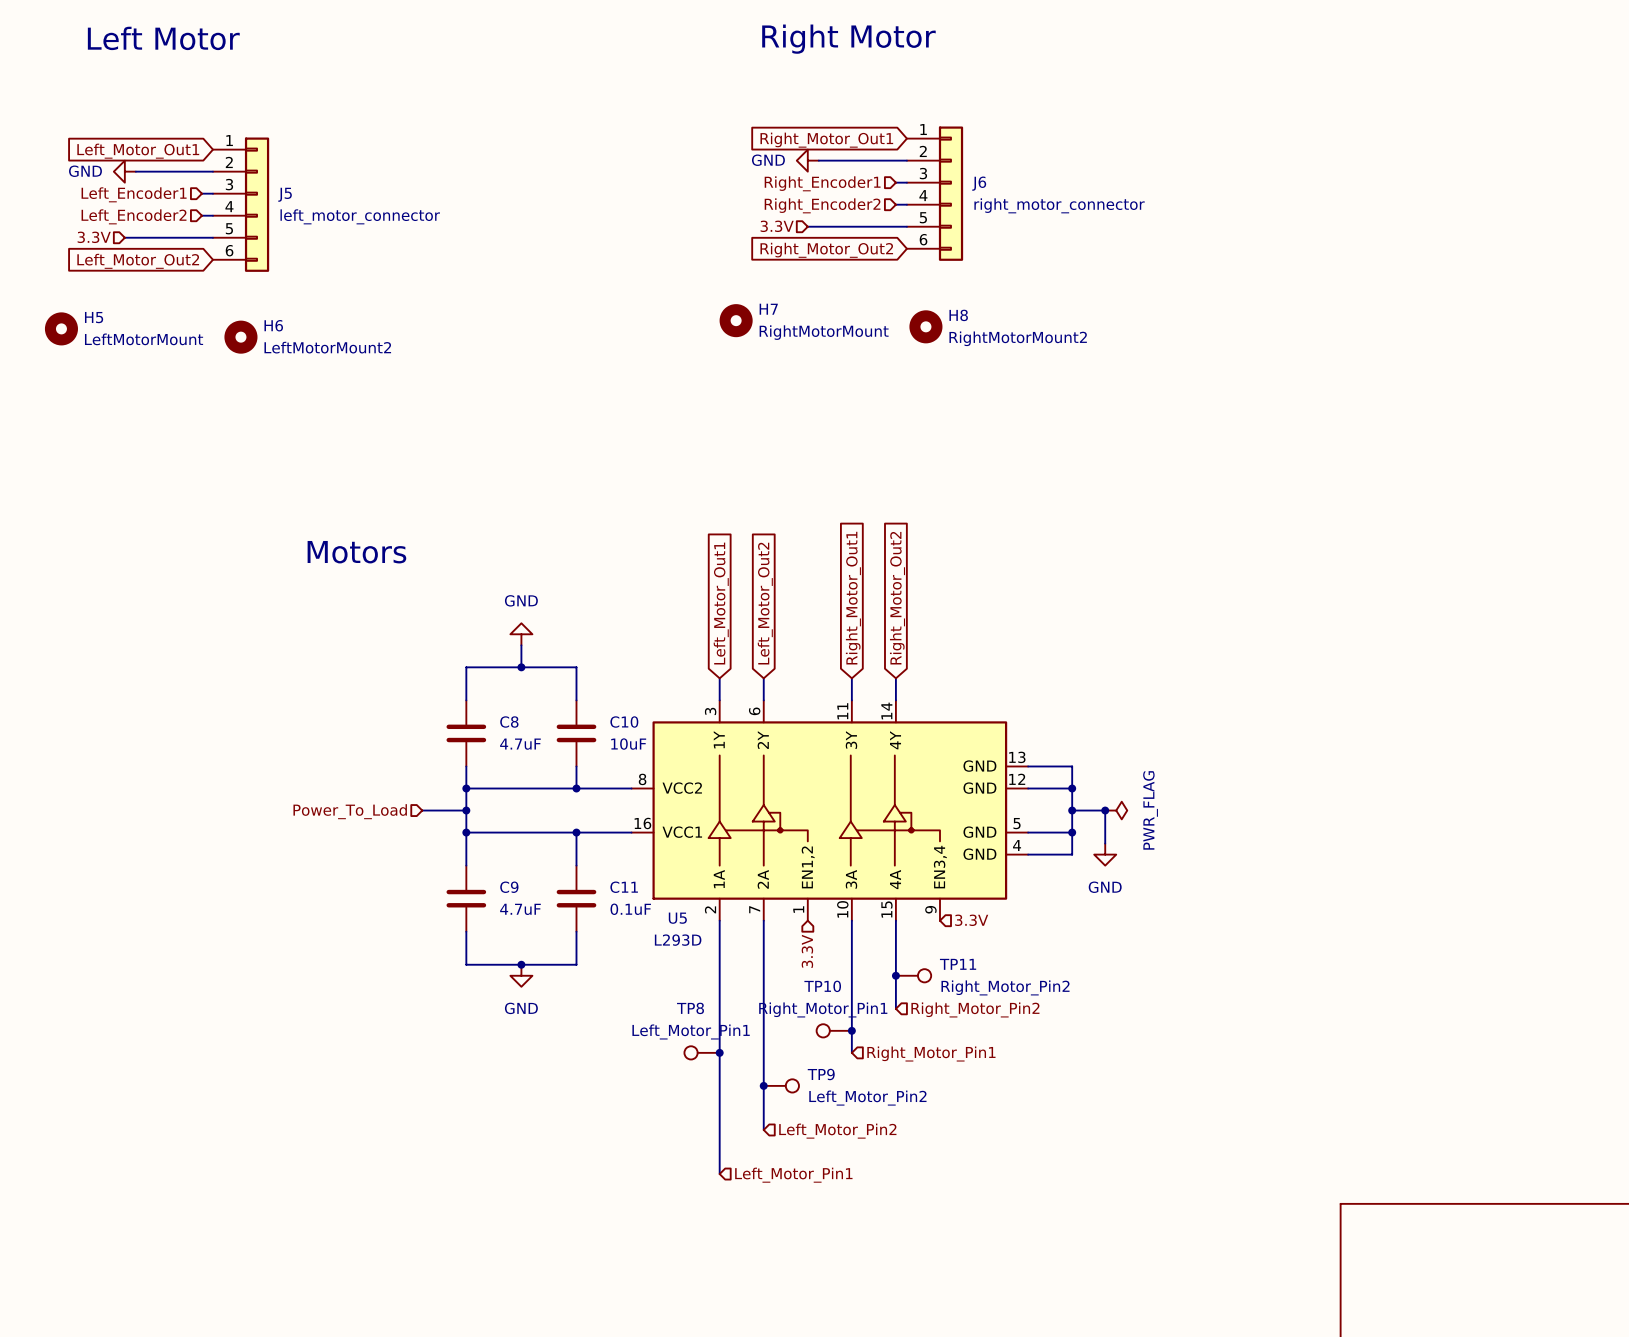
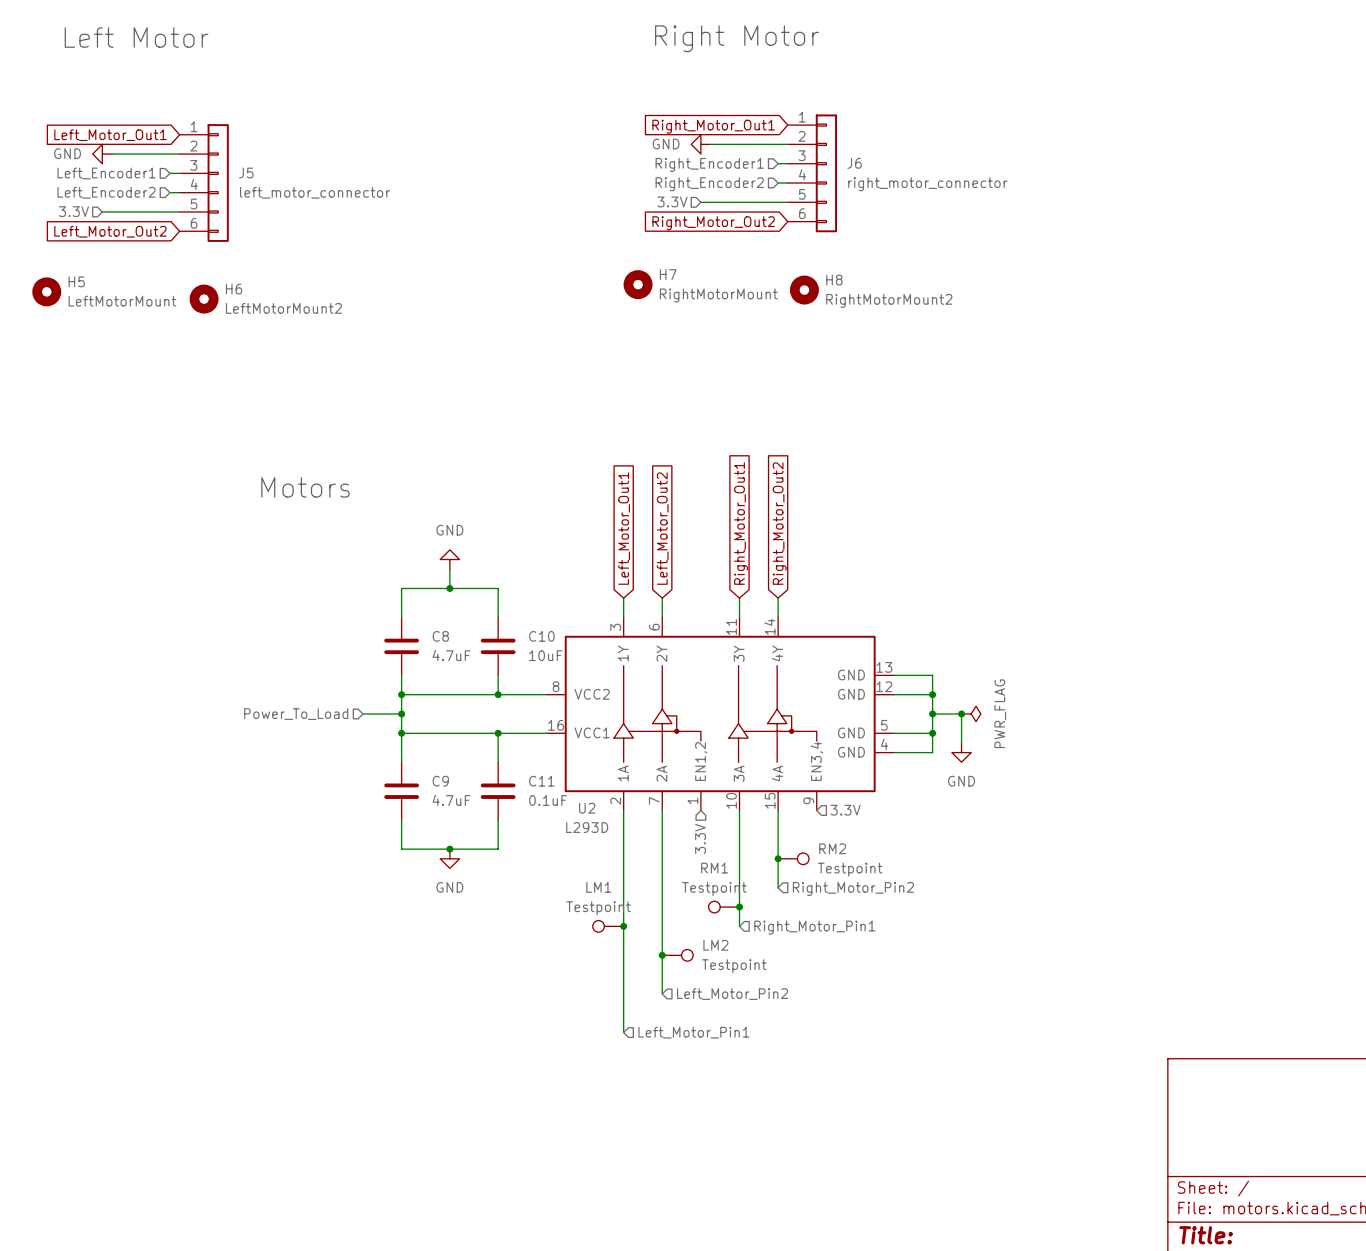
U5 name: U5 (677, 918) -> U2 (587, 808)
TP11 name: TP11 (958, 964) -> RM2 (832, 848)
TP10 name: TP10 (822, 986) -> RM1 (714, 868)
TP11 value: Right_Motor_Pin2 (1005, 987) -> Testpoint (850, 869)
TP8 name: TP8 (690, 1008) -> LM1 (598, 887)
TP10 value: Right_Motor_Pin1 (823, 1009) -> Testpoint (714, 889)
TP8 value: Left_Motor_Pin1 (691, 1031) -> Testpoint (598, 908)
TP9 name: TP9 (821, 1074) -> LM2 (715, 945)
TP9 value: Left_Motor_Pin2 (867, 1098) -> Testpoint (734, 966)

